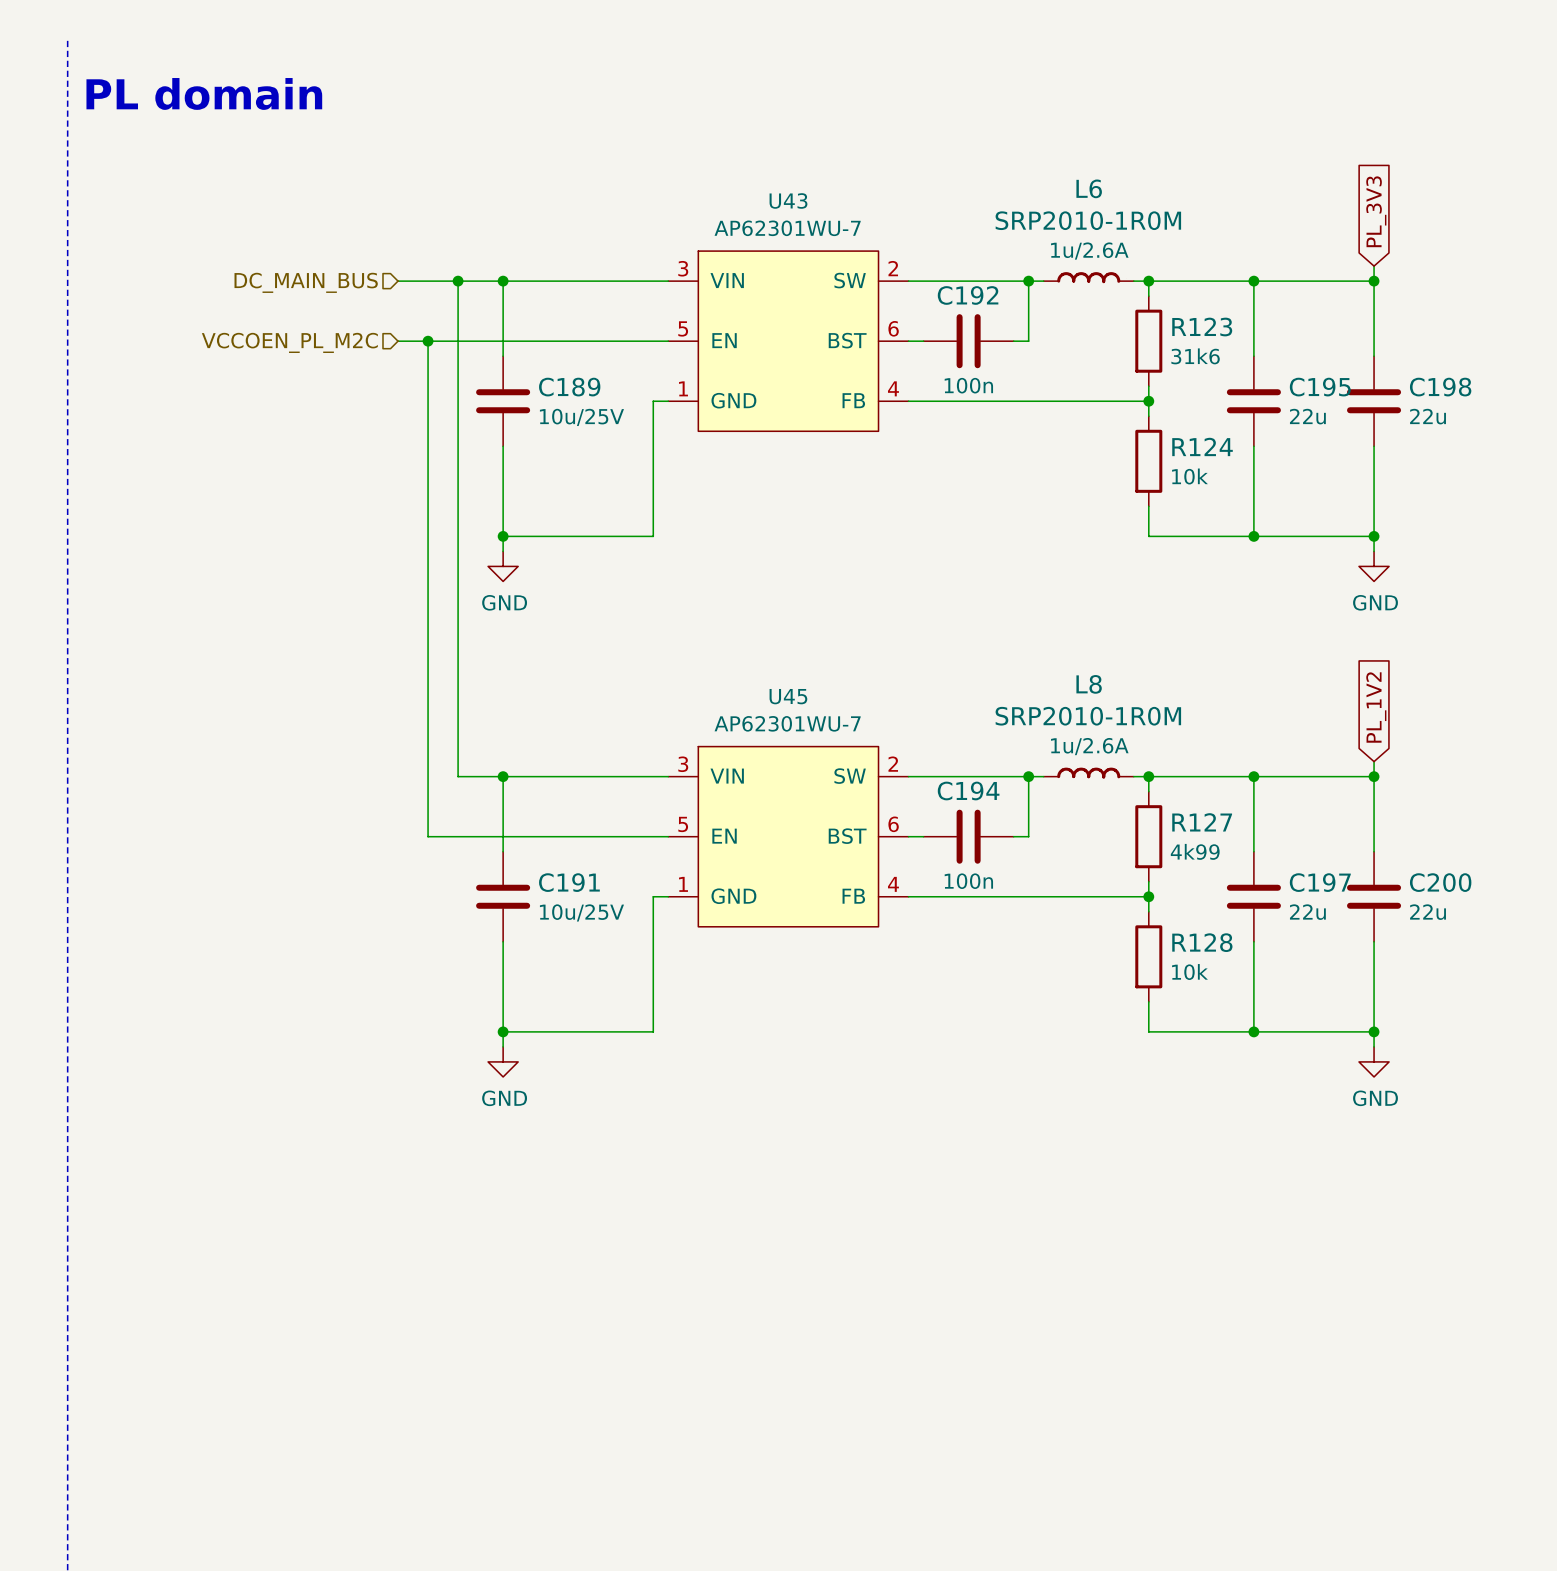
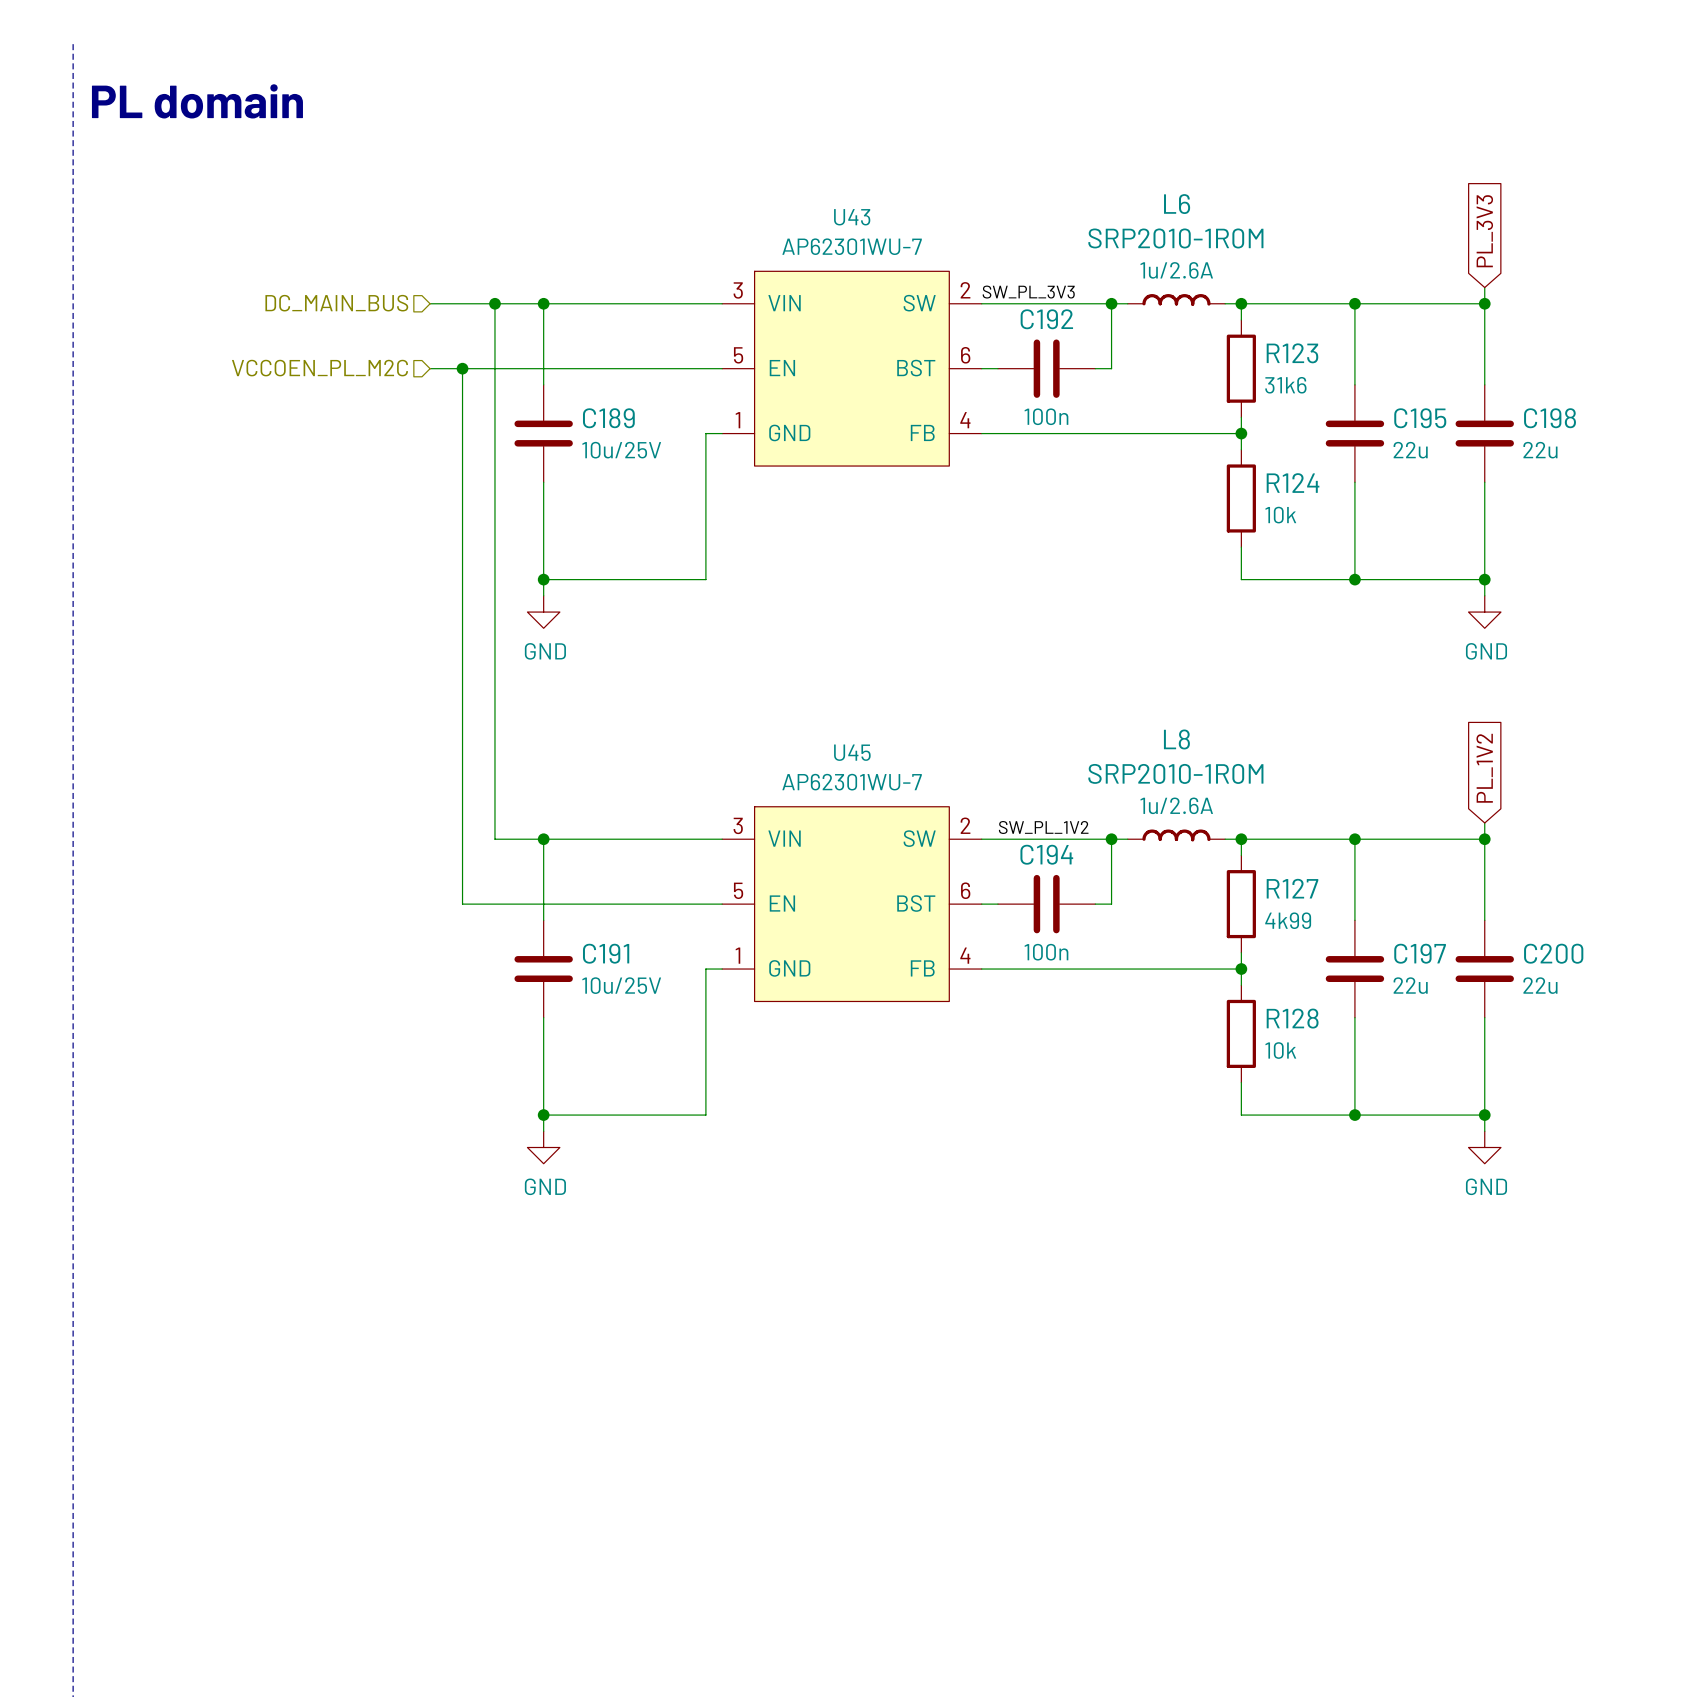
label: none -> SW_PL_3V3 (1028, 292)
label: none -> SW_PL_1V2 (1043, 827)

